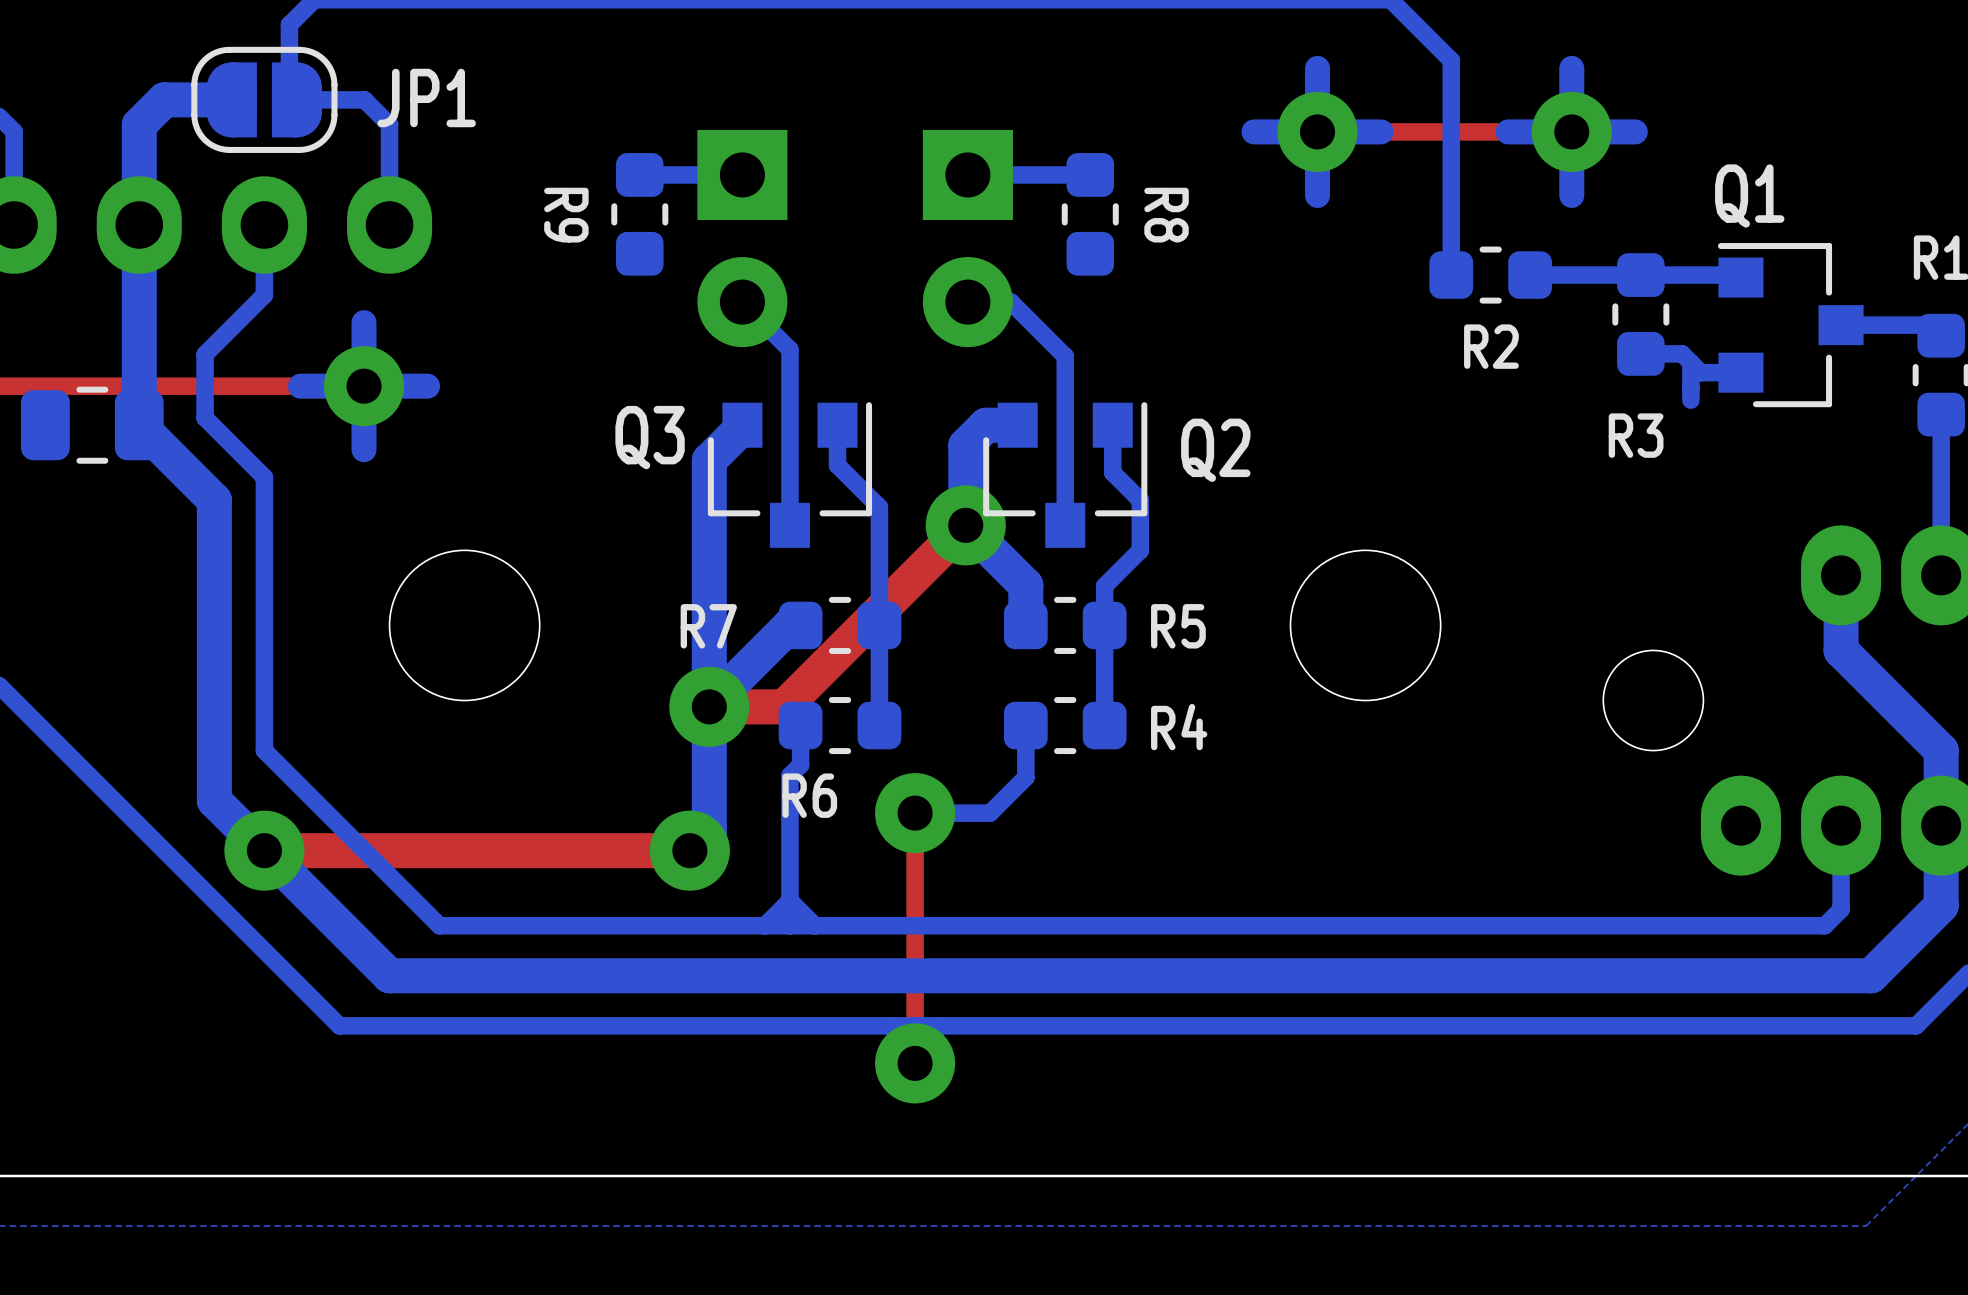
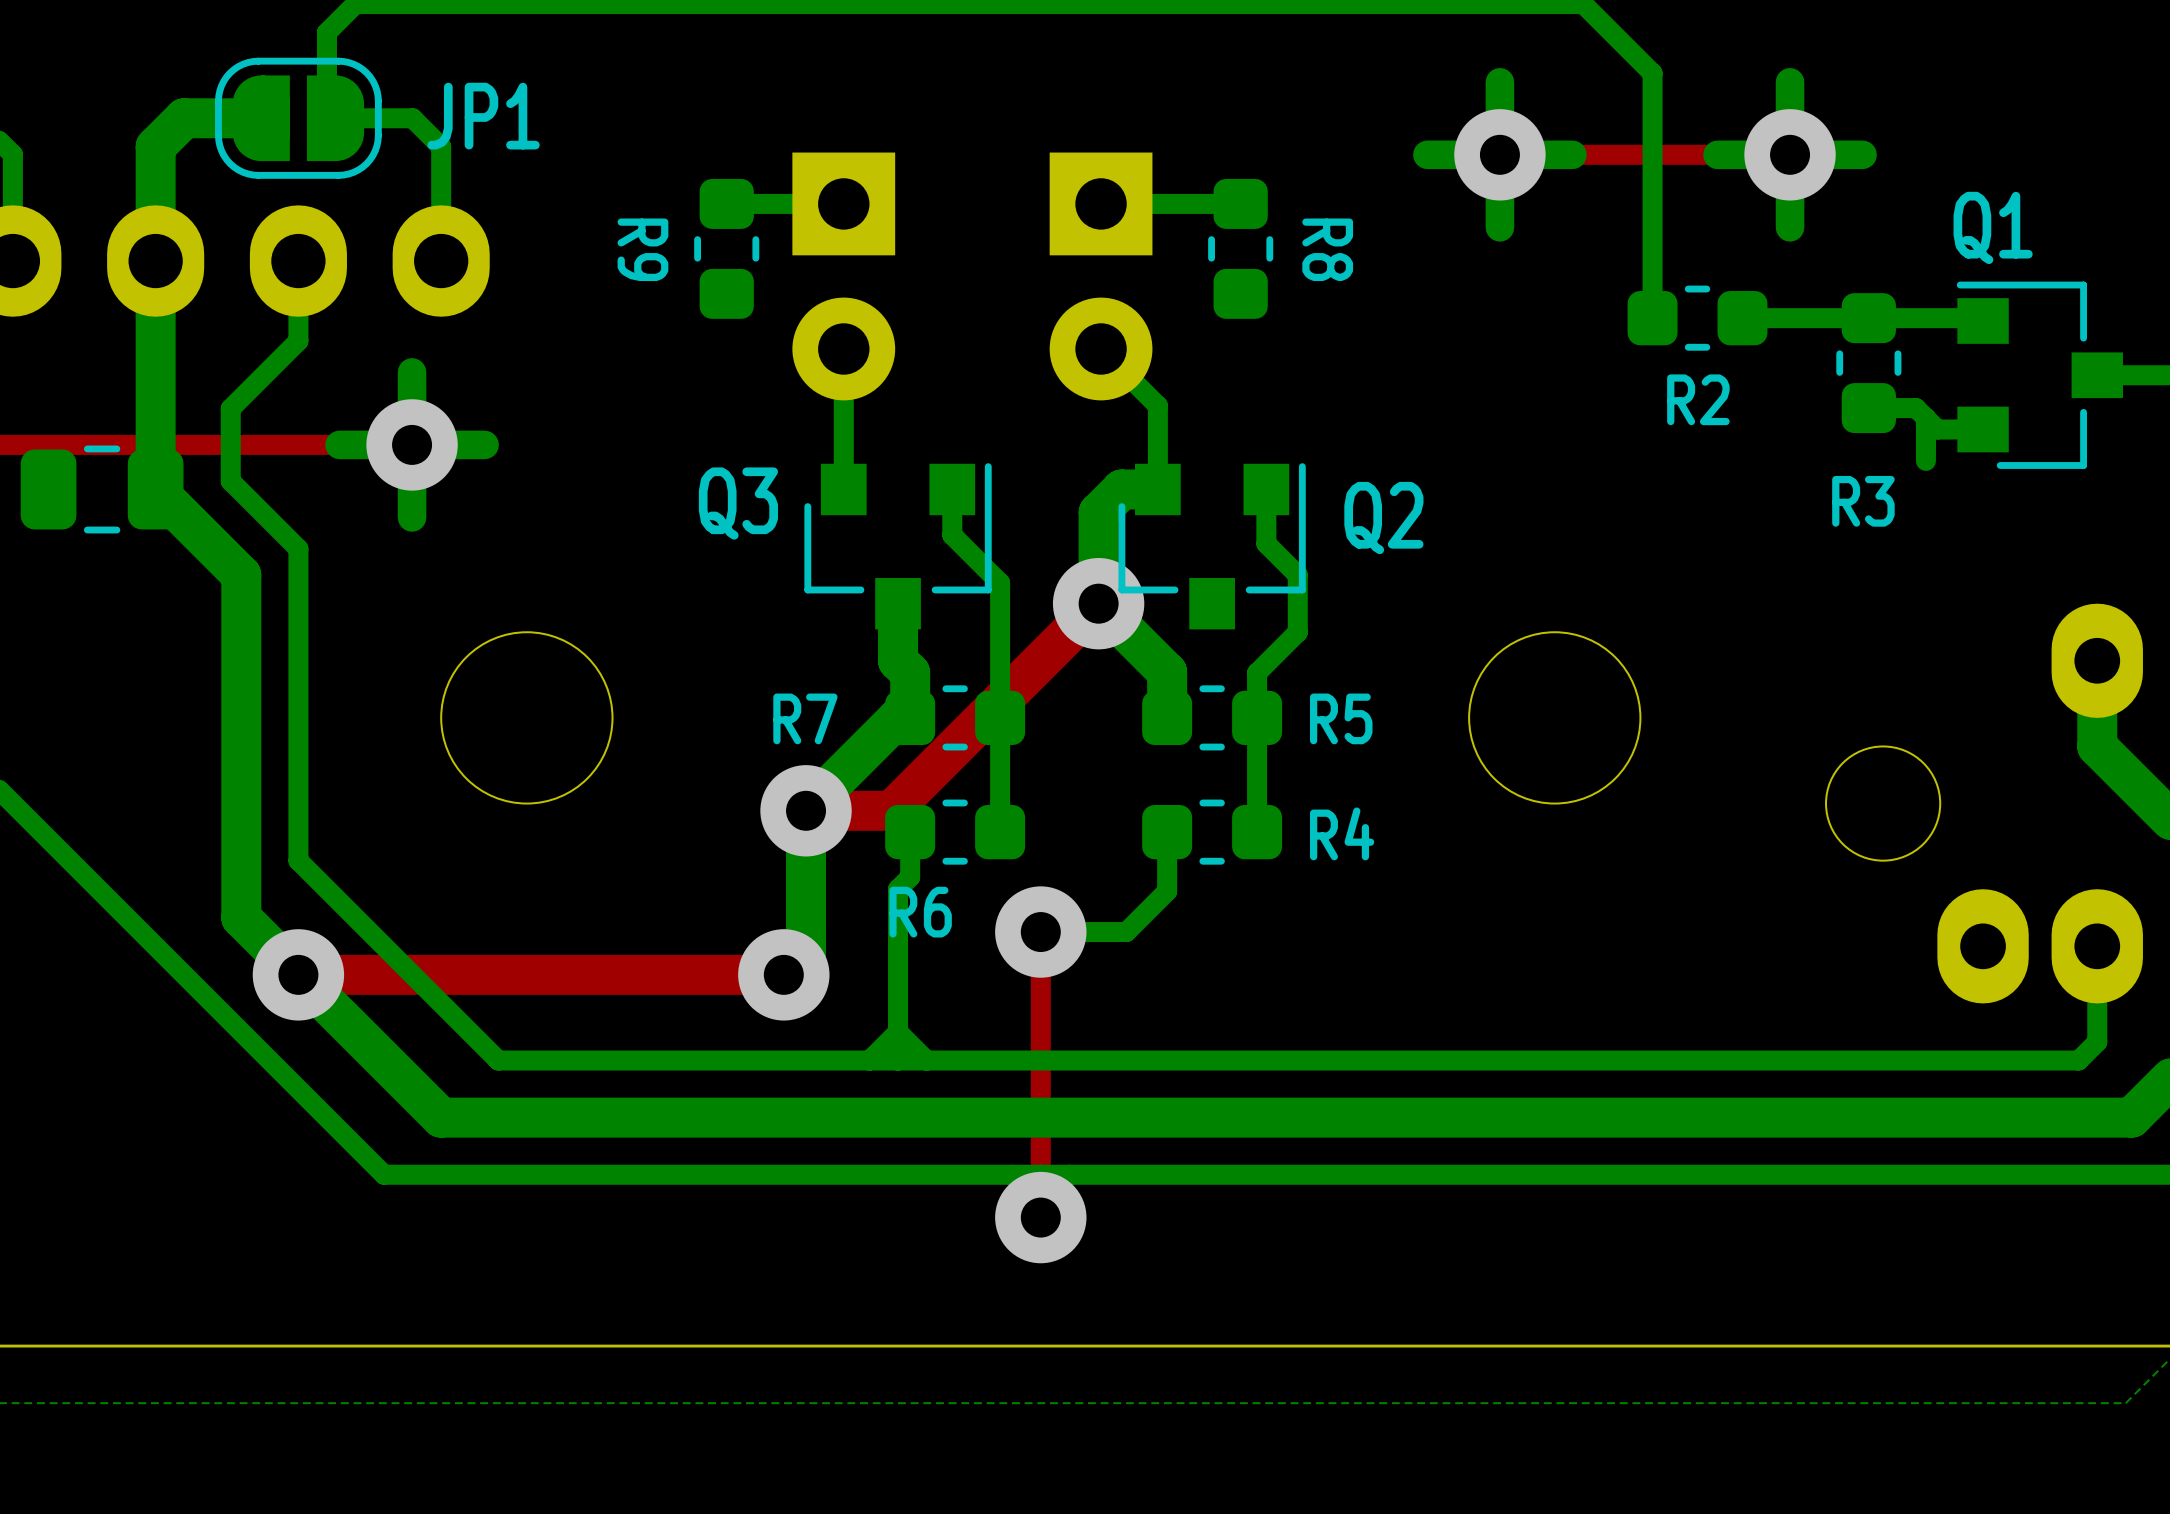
bottom track: (742, 302) (789, 349) (789, 525) -> (843, 348) (843, 489)
bottom track: (967, 302) (1010, 302) (1065, 356) (1065, 525) -> (1101, 348) (1157, 405) (1157, 489)
bottom track: (742, 425) (709, 460) (709, 706) -> none
bottom track: none -> (898, 603) (898, 660) (910, 672) (910, 717)

